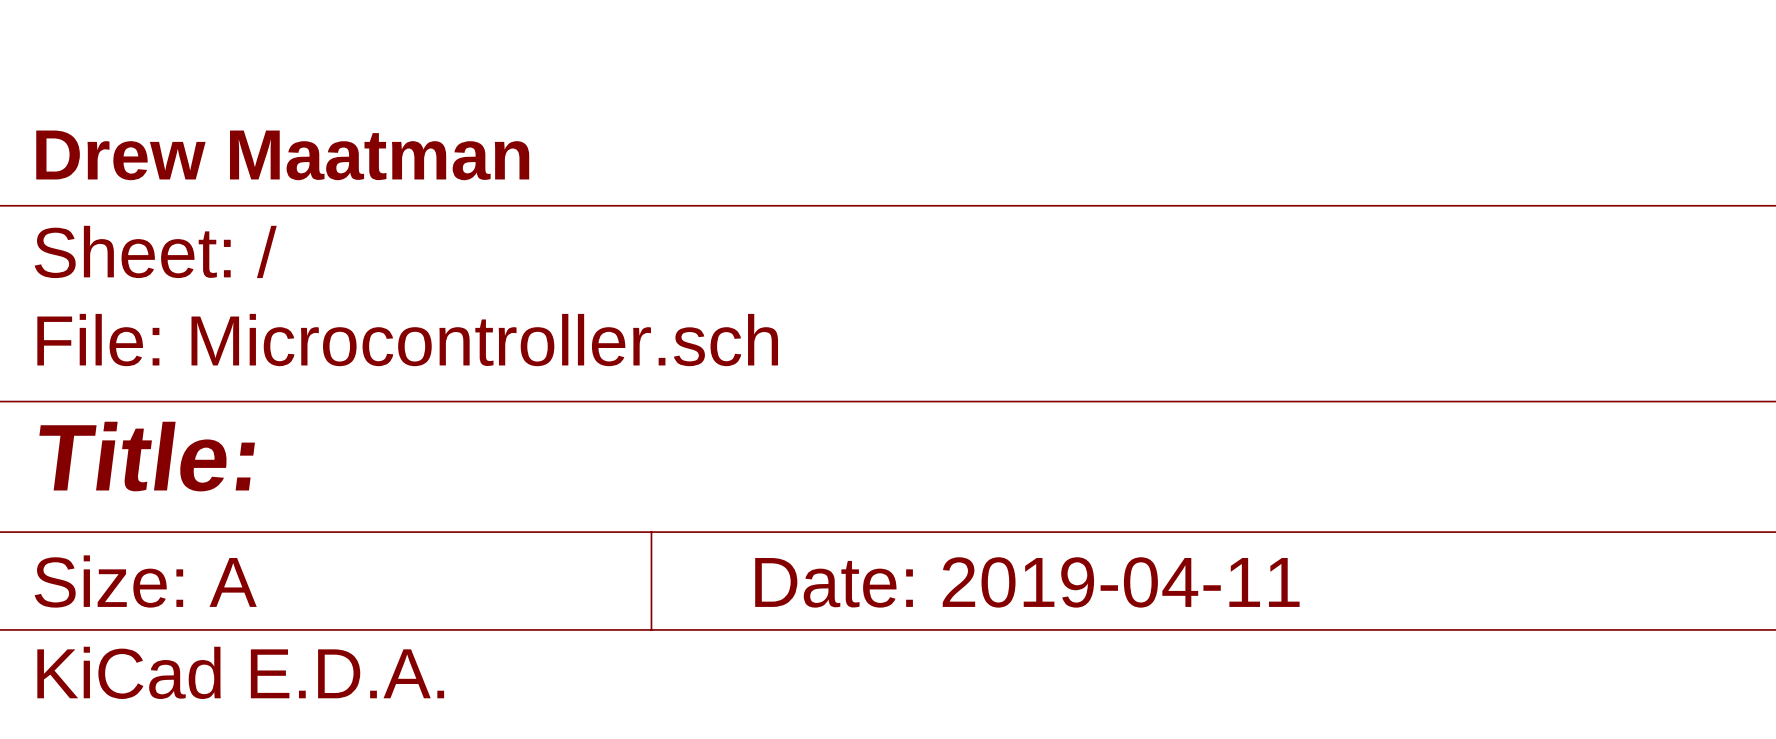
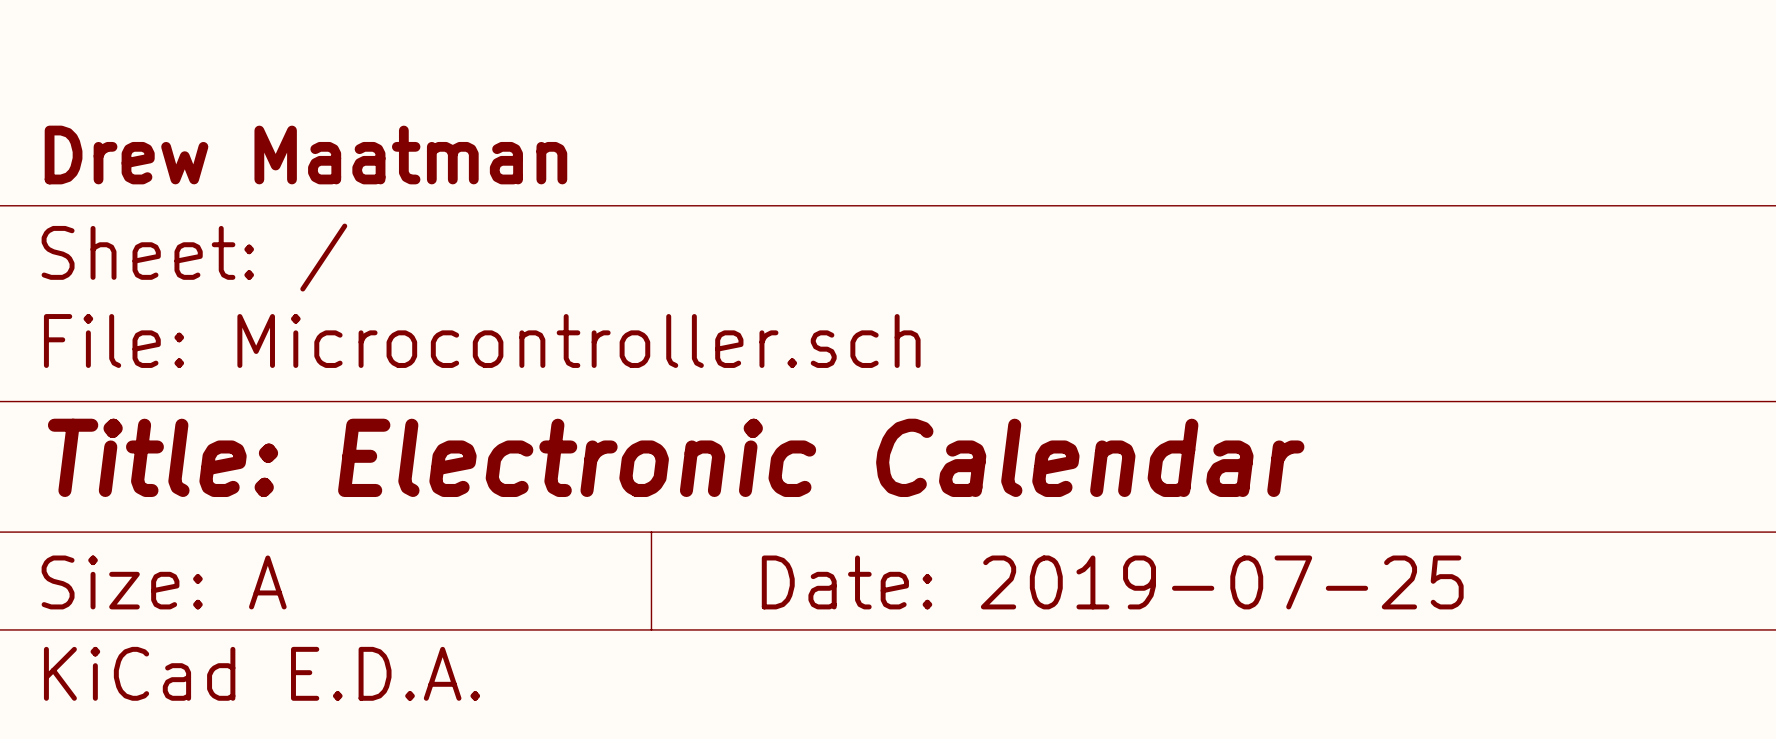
title block: Title: (147, 456) -> Title: Electronic Calendar (676, 457)
title block: Date: 2019-04-11 (1027, 582) -> Date: 2019-07-25 (1112, 582)

